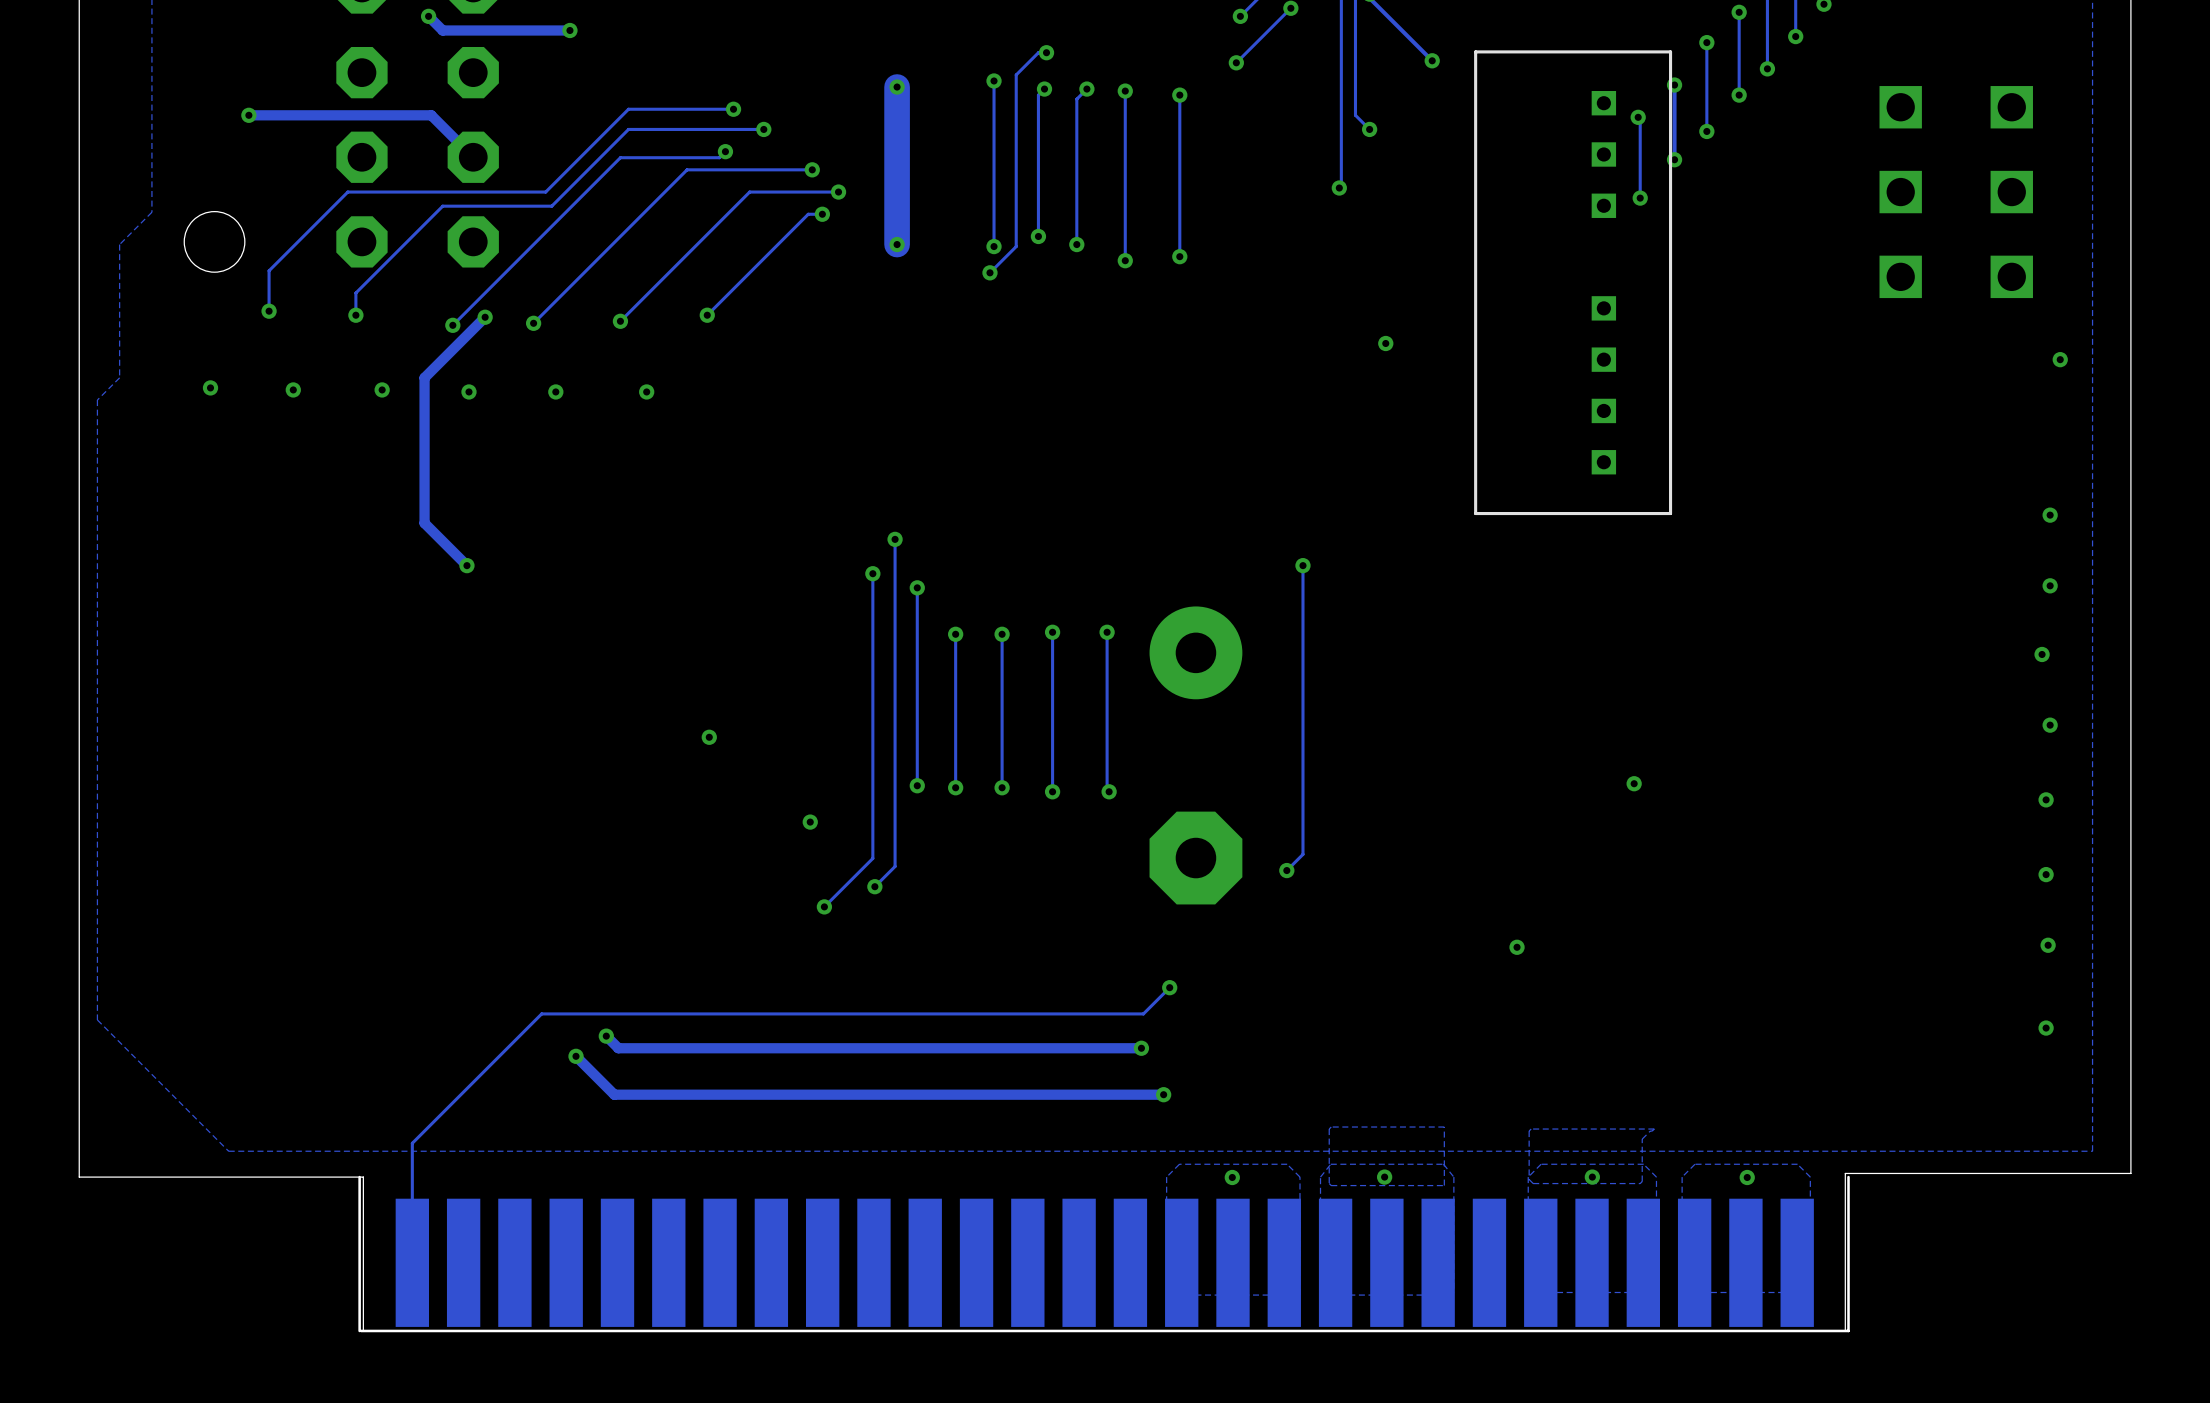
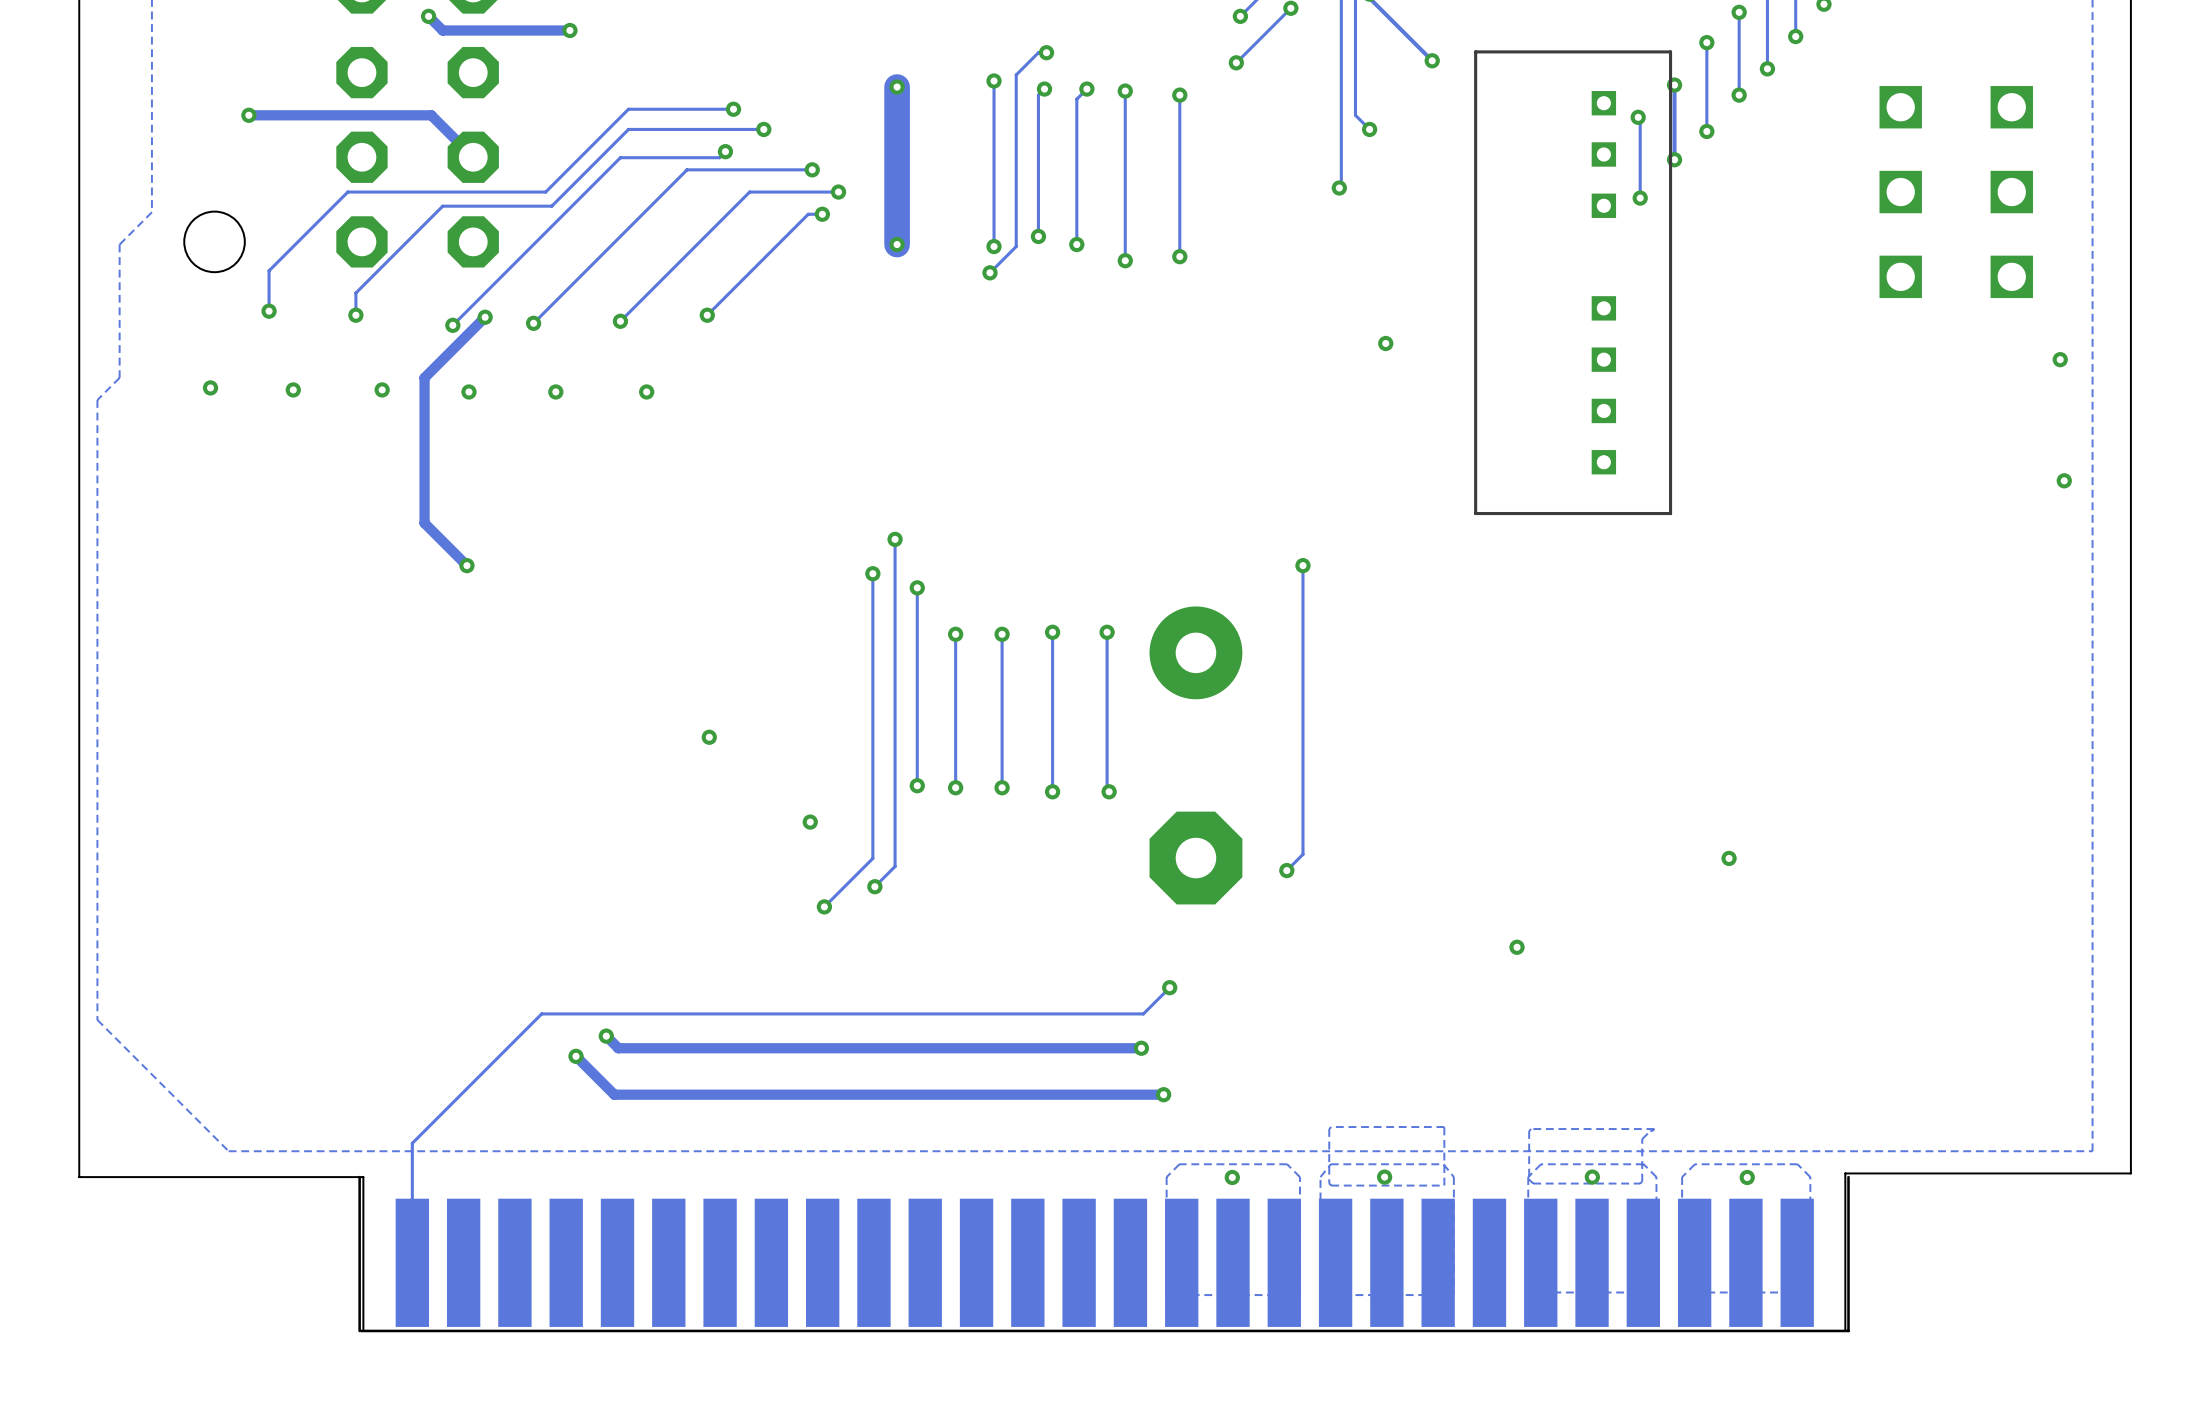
via position: (2050, 515) -> (2064, 480)
via: (2050, 585) -> none
via: (2042, 654) -> none
via: (2050, 725) -> none
via position: (1634, 783) -> (1729, 858)
via: (2046, 799) -> none
via: (2046, 874) -> none
via: (2048, 945) -> none
via: (2046, 1028) -> none

